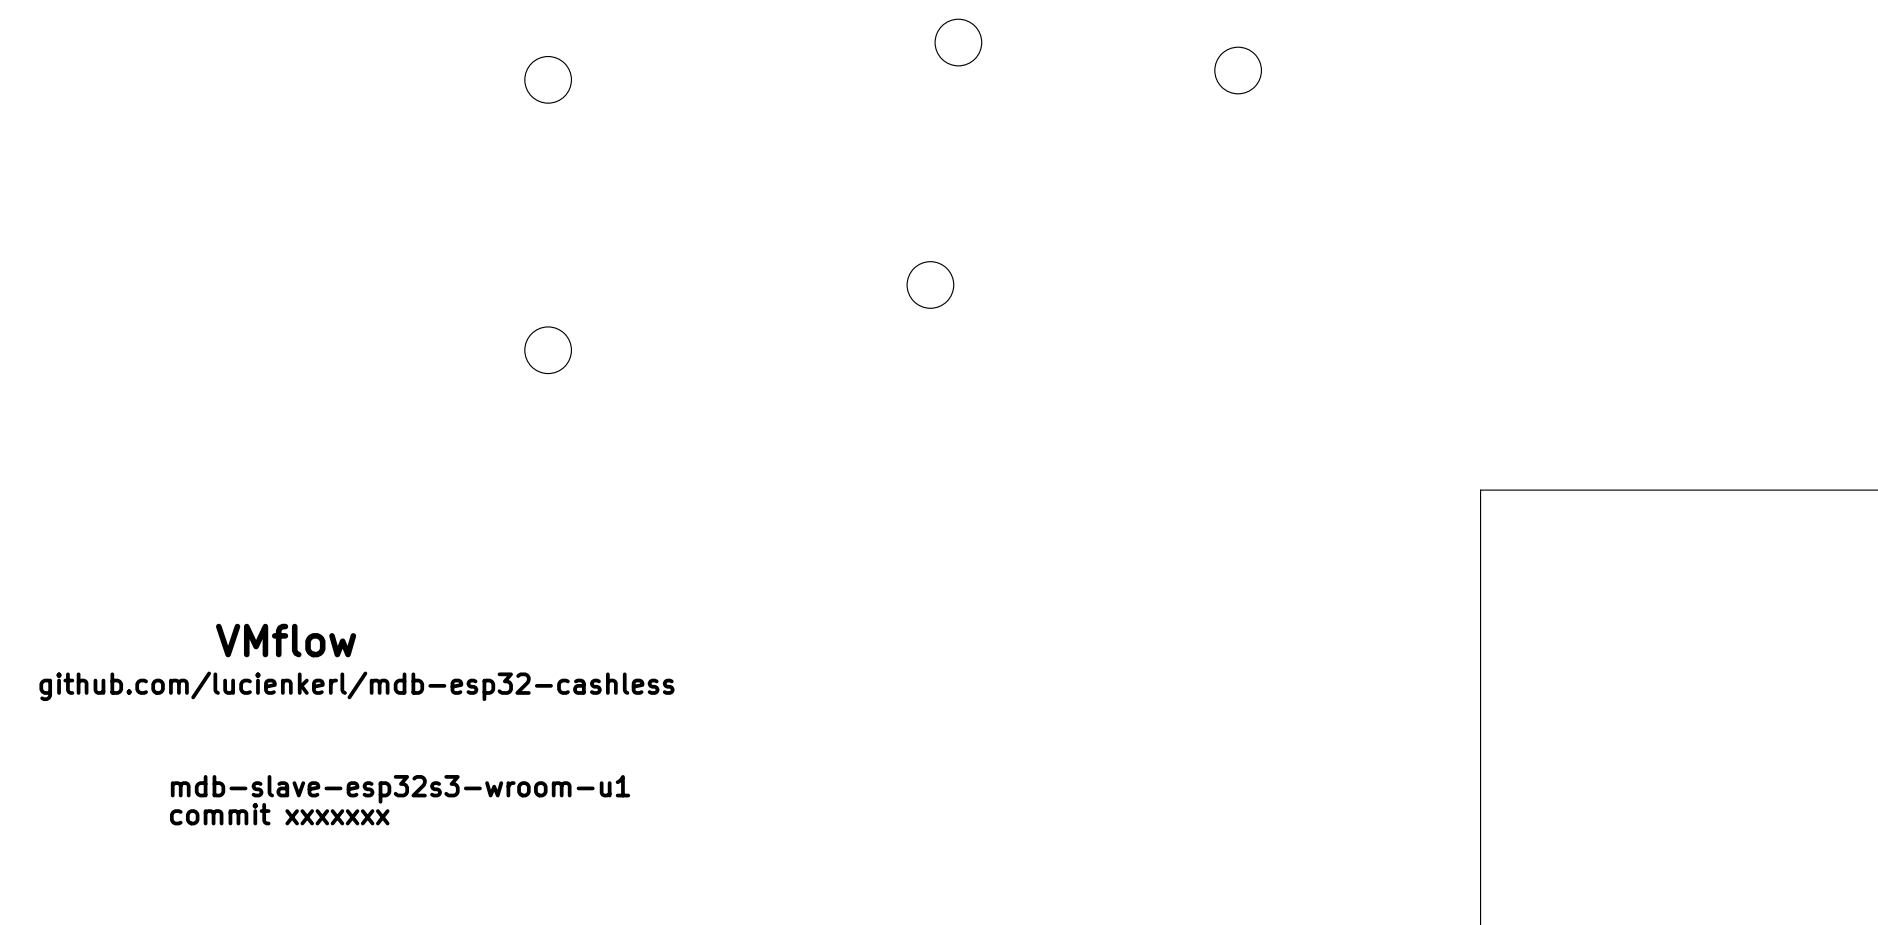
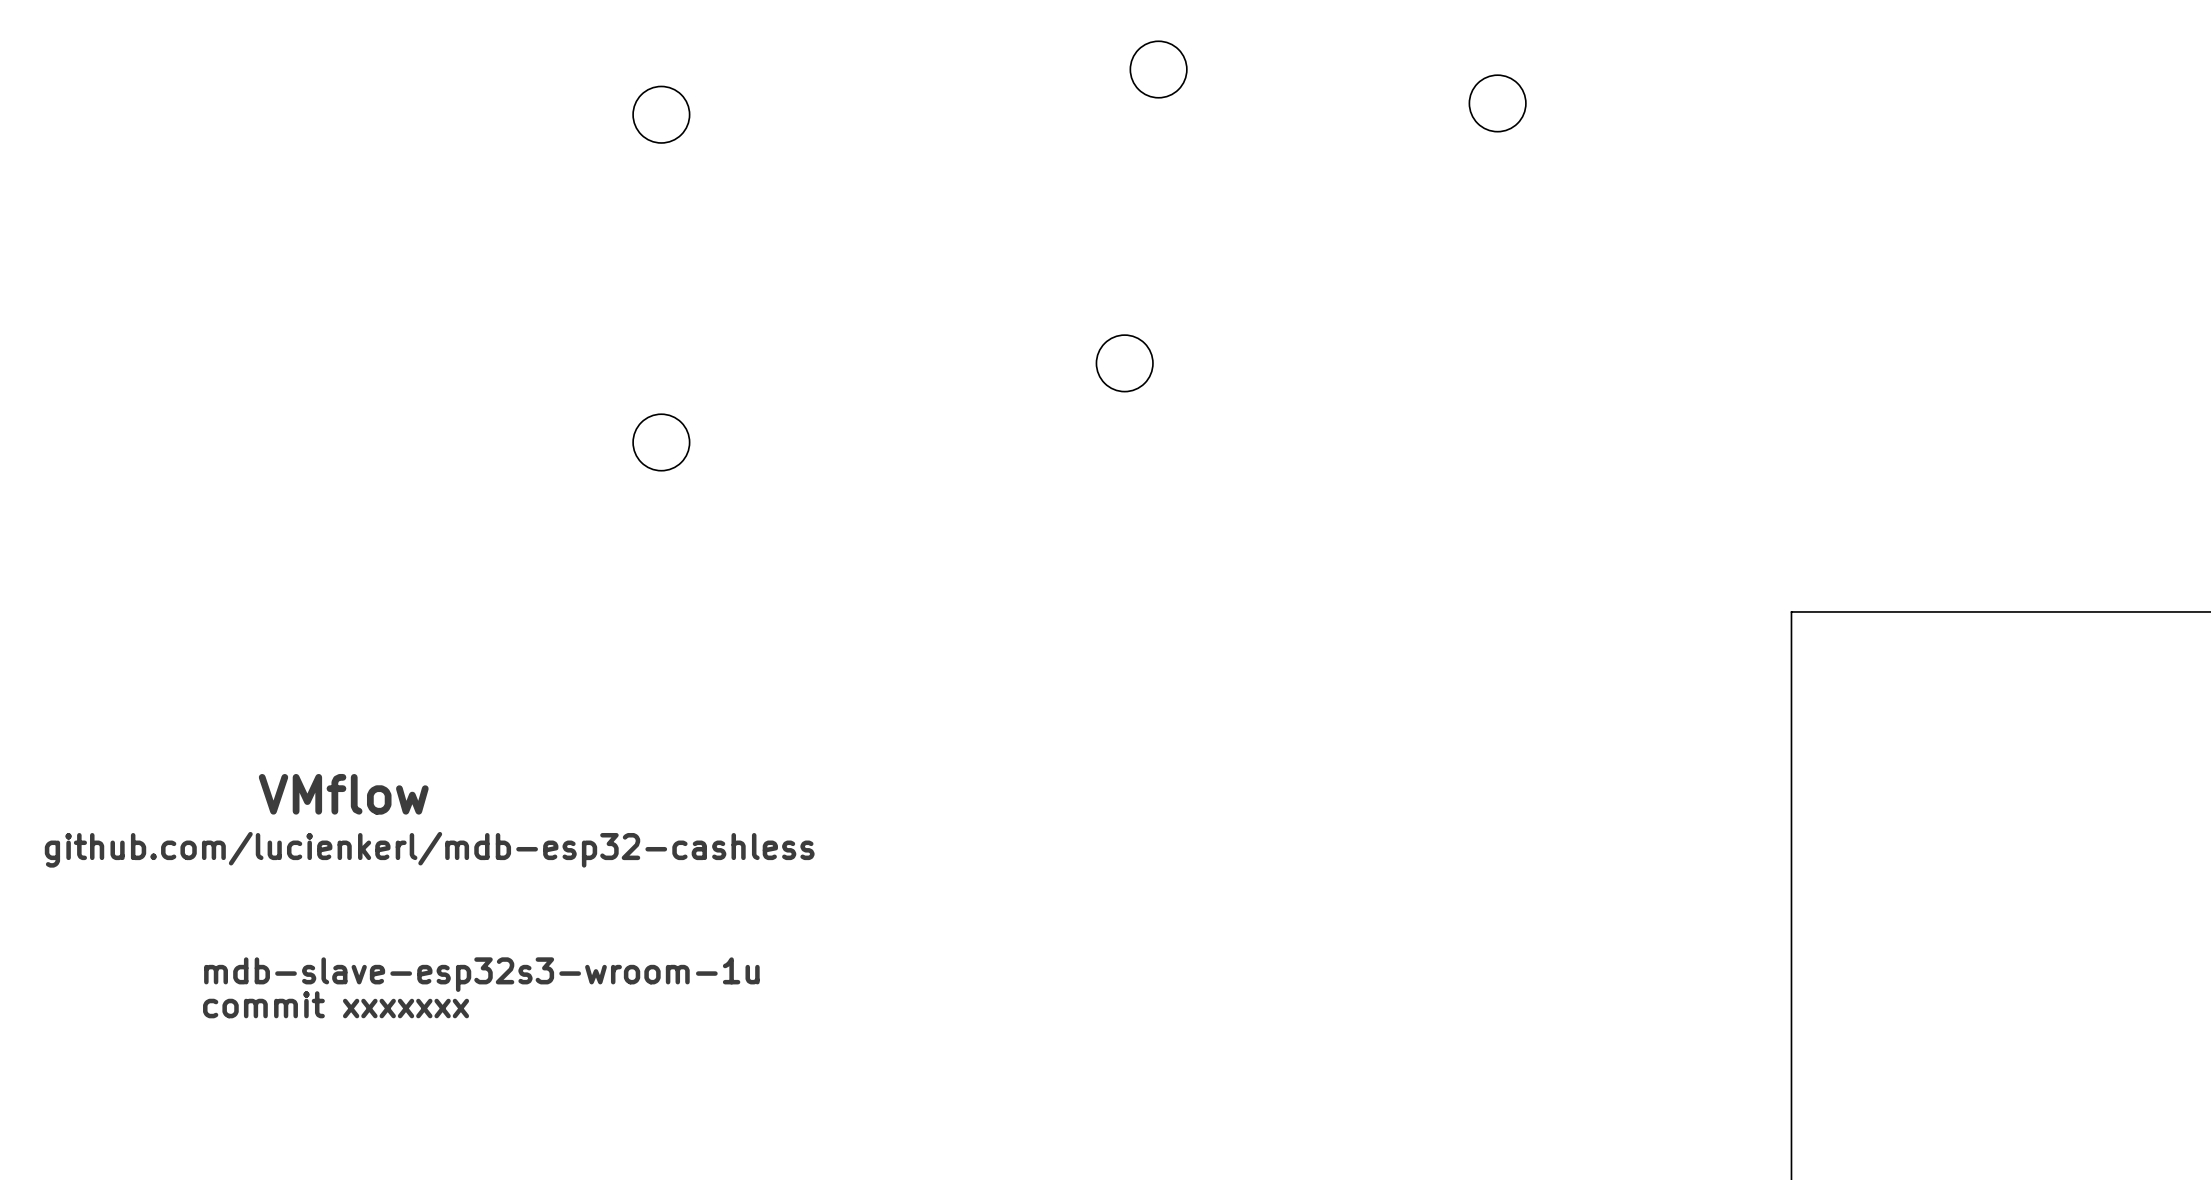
text: mdb-slave-esp32s3-wroom-u1 (400, 789) -> mdb-slave-esp32s3-wroom-1u (481, 974)

